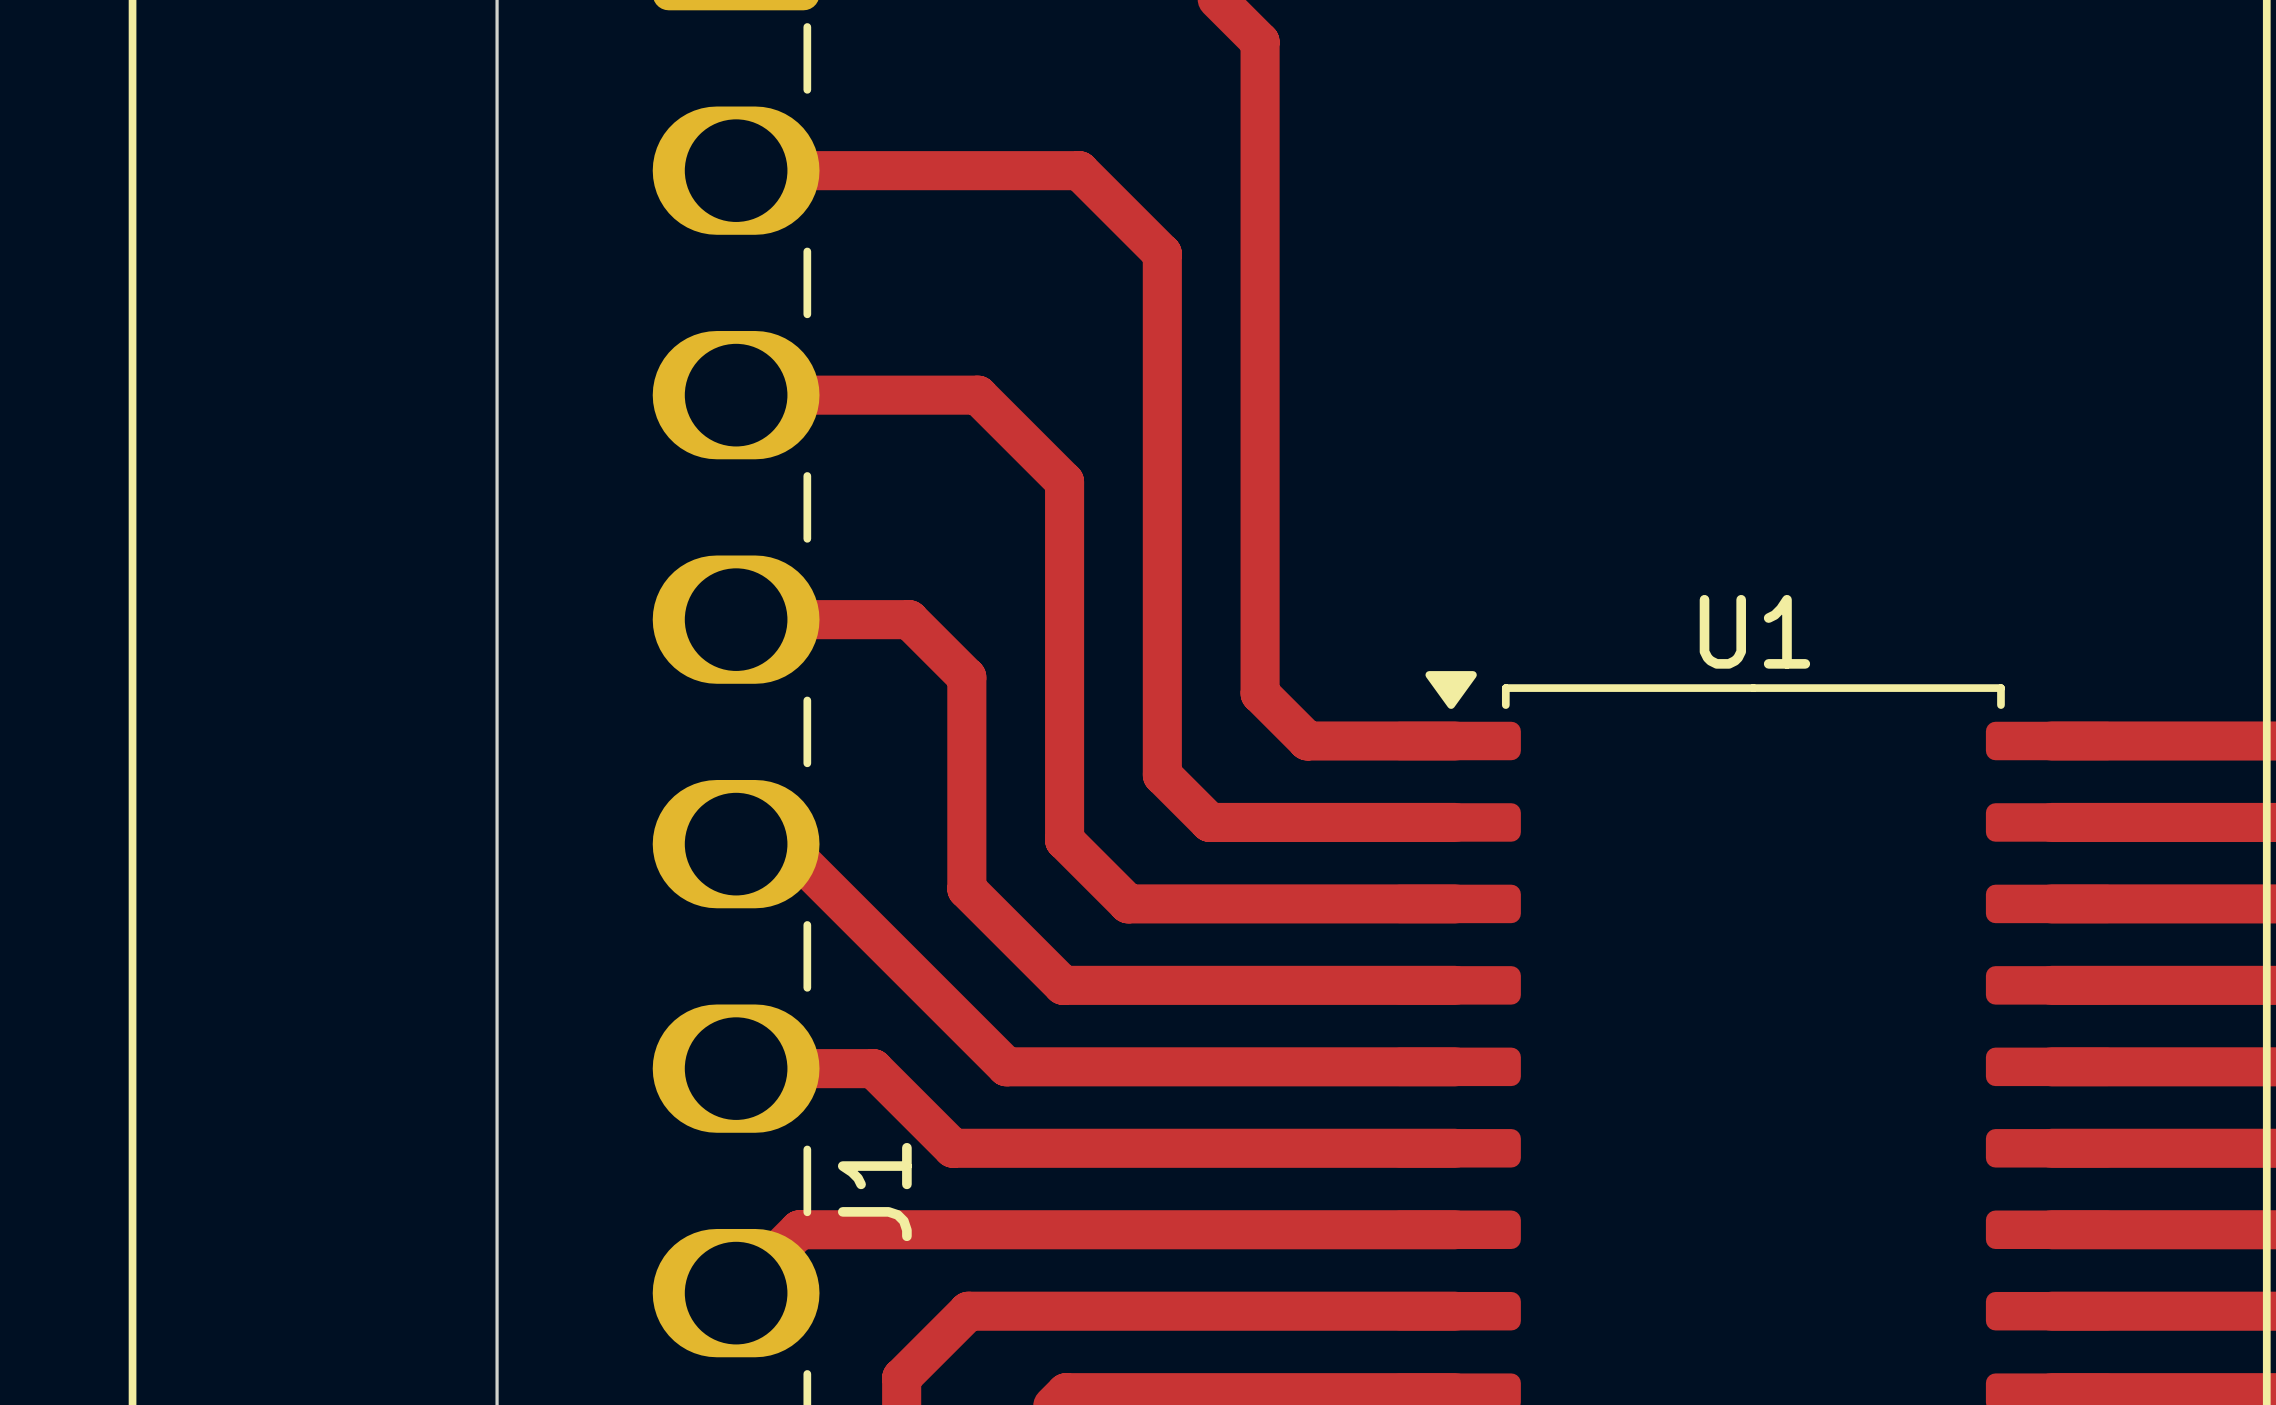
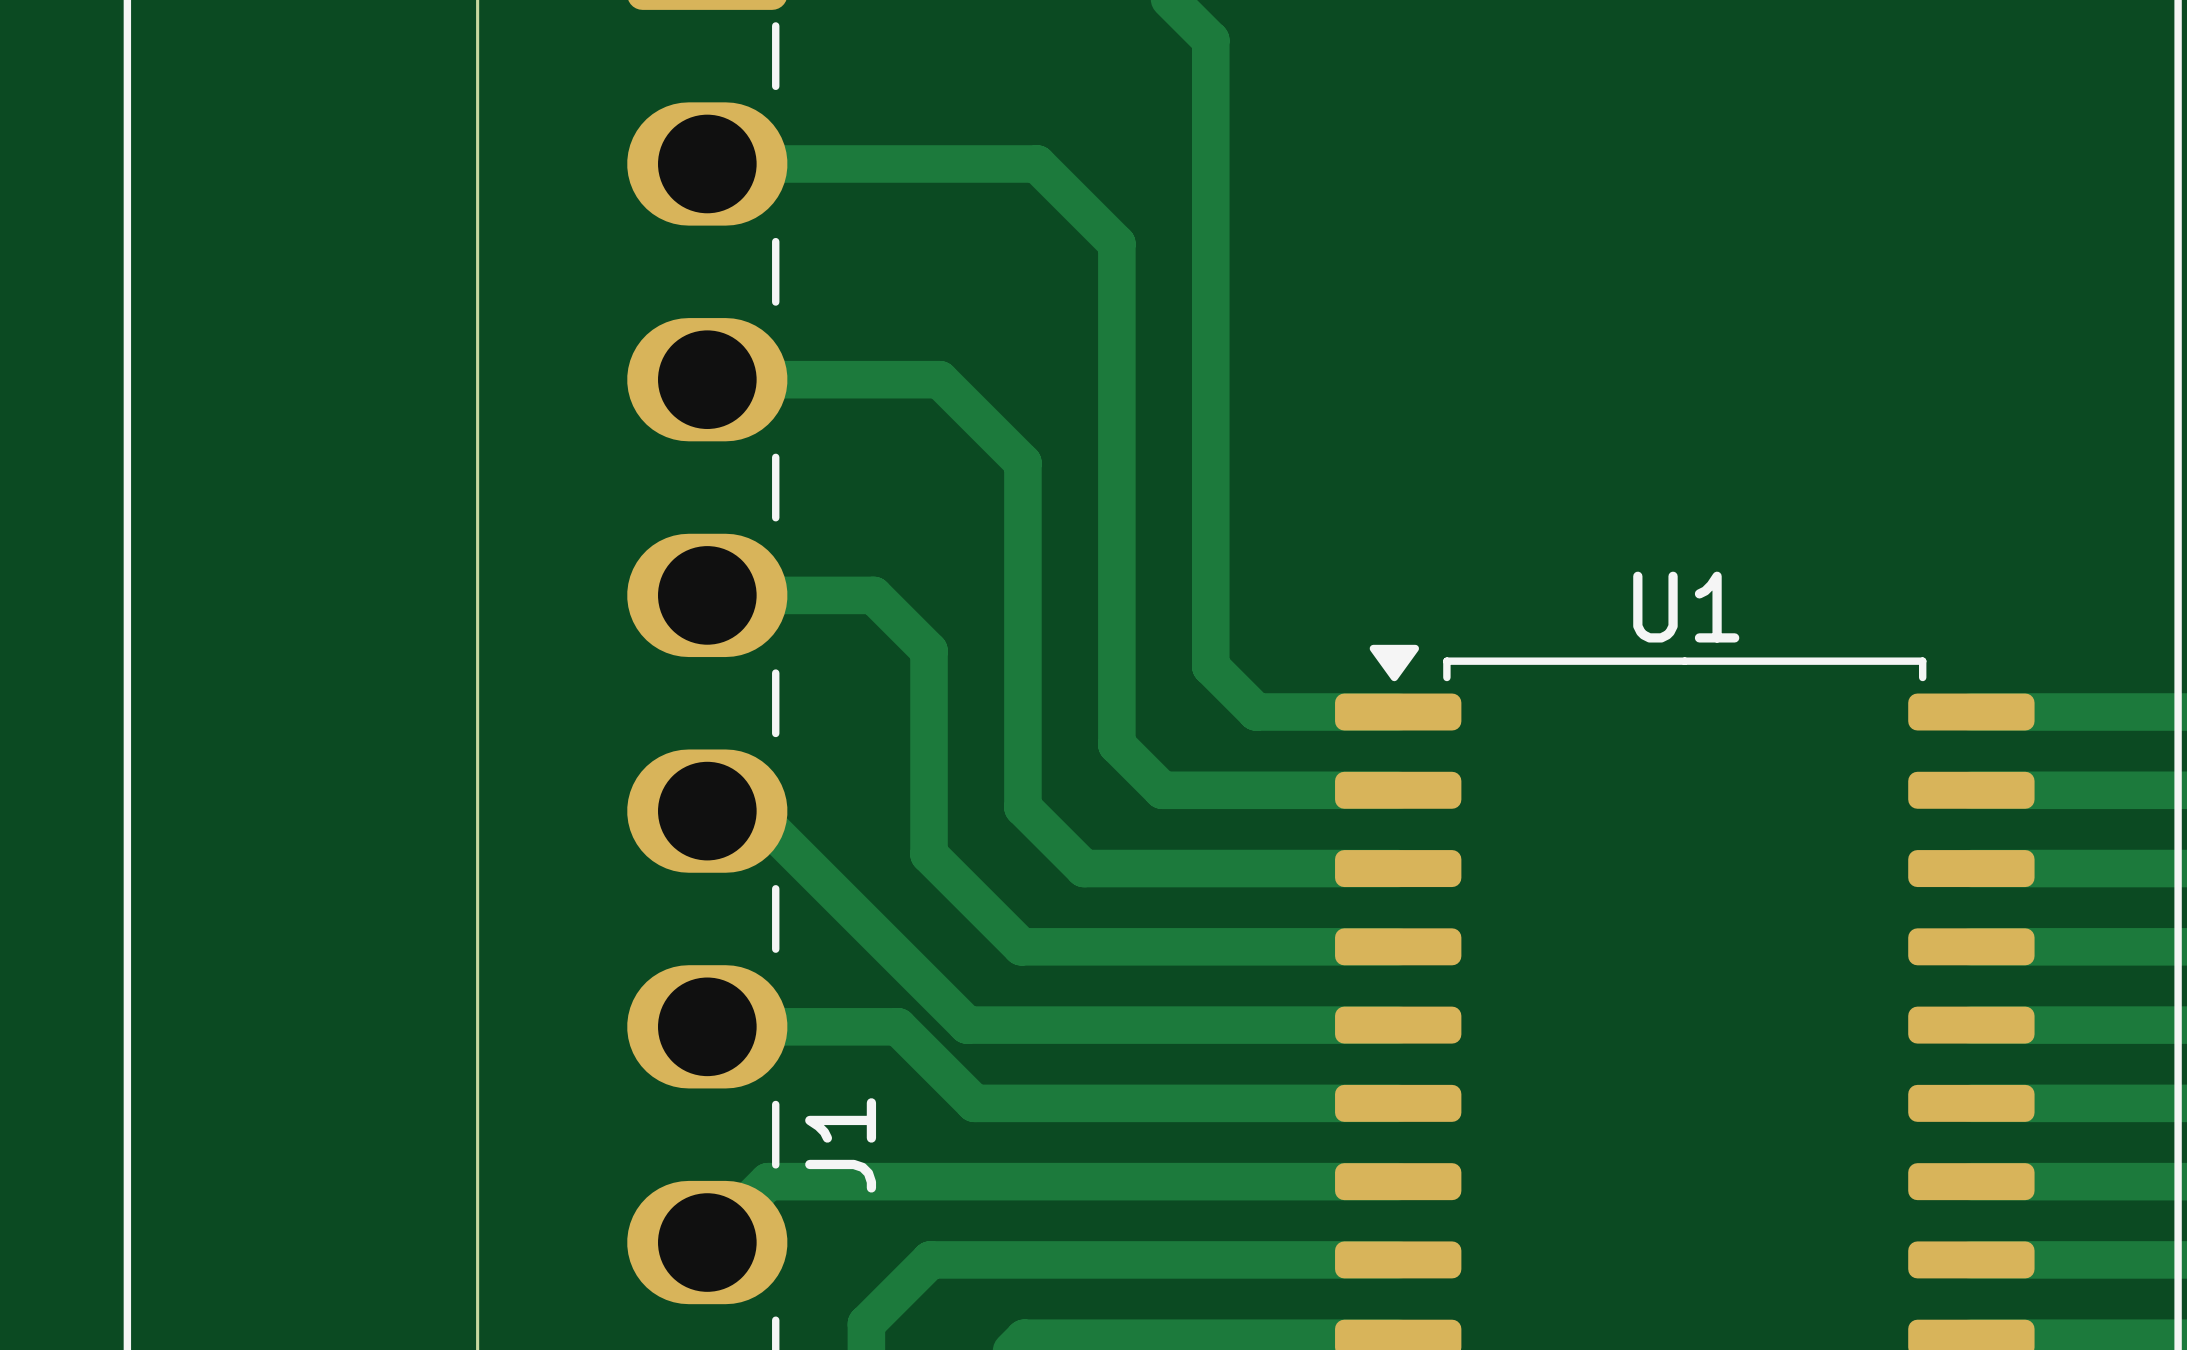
track: (873, 1068) (953, 1148) (1014, 1148) -> (839, 1026) (898, 1026) (974, 1103)

